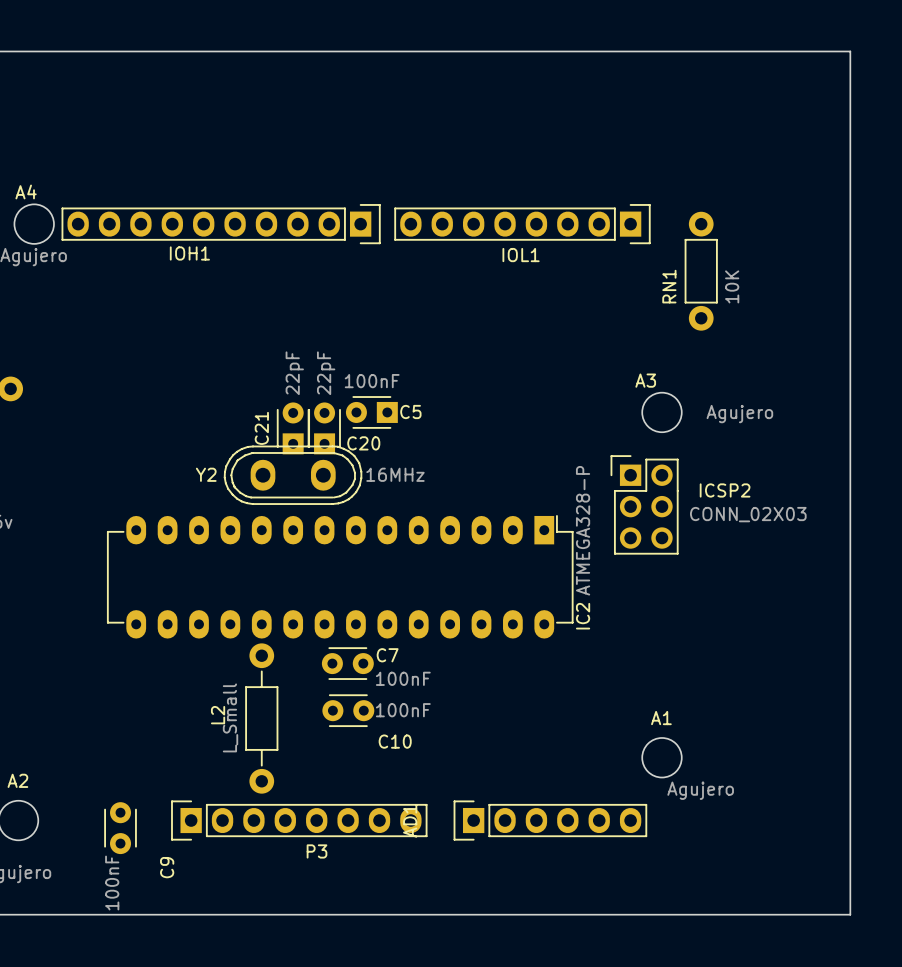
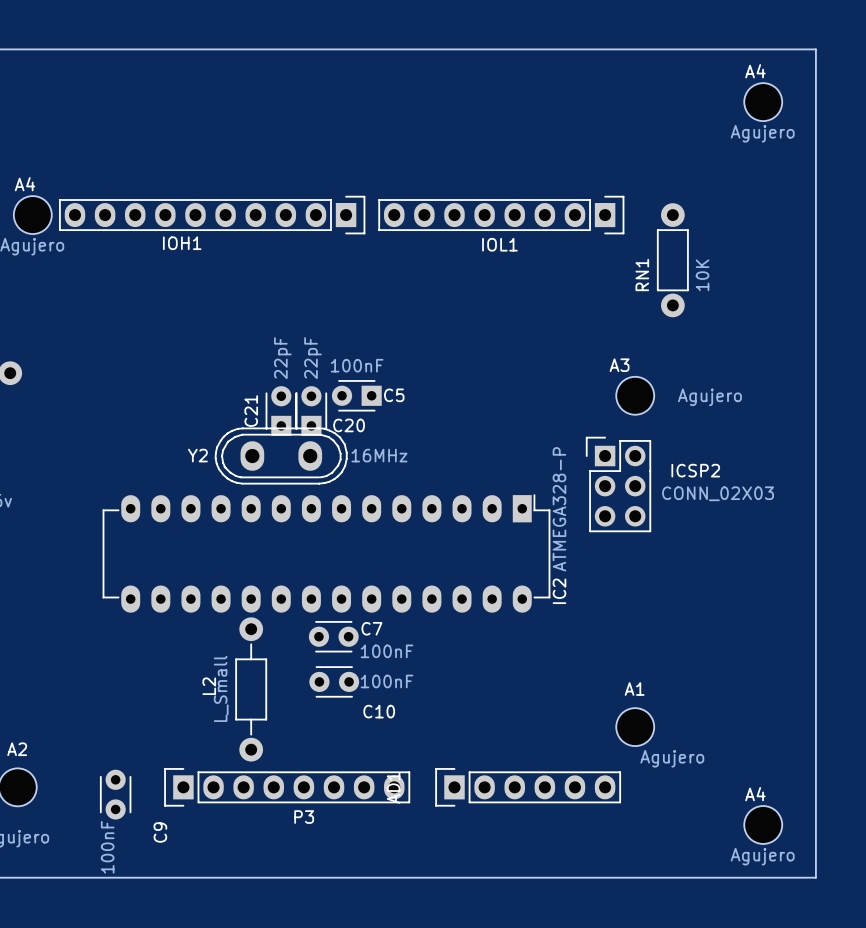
A4: none -> Agujero (763, 102)
A4: none -> Agujero (763, 824)

